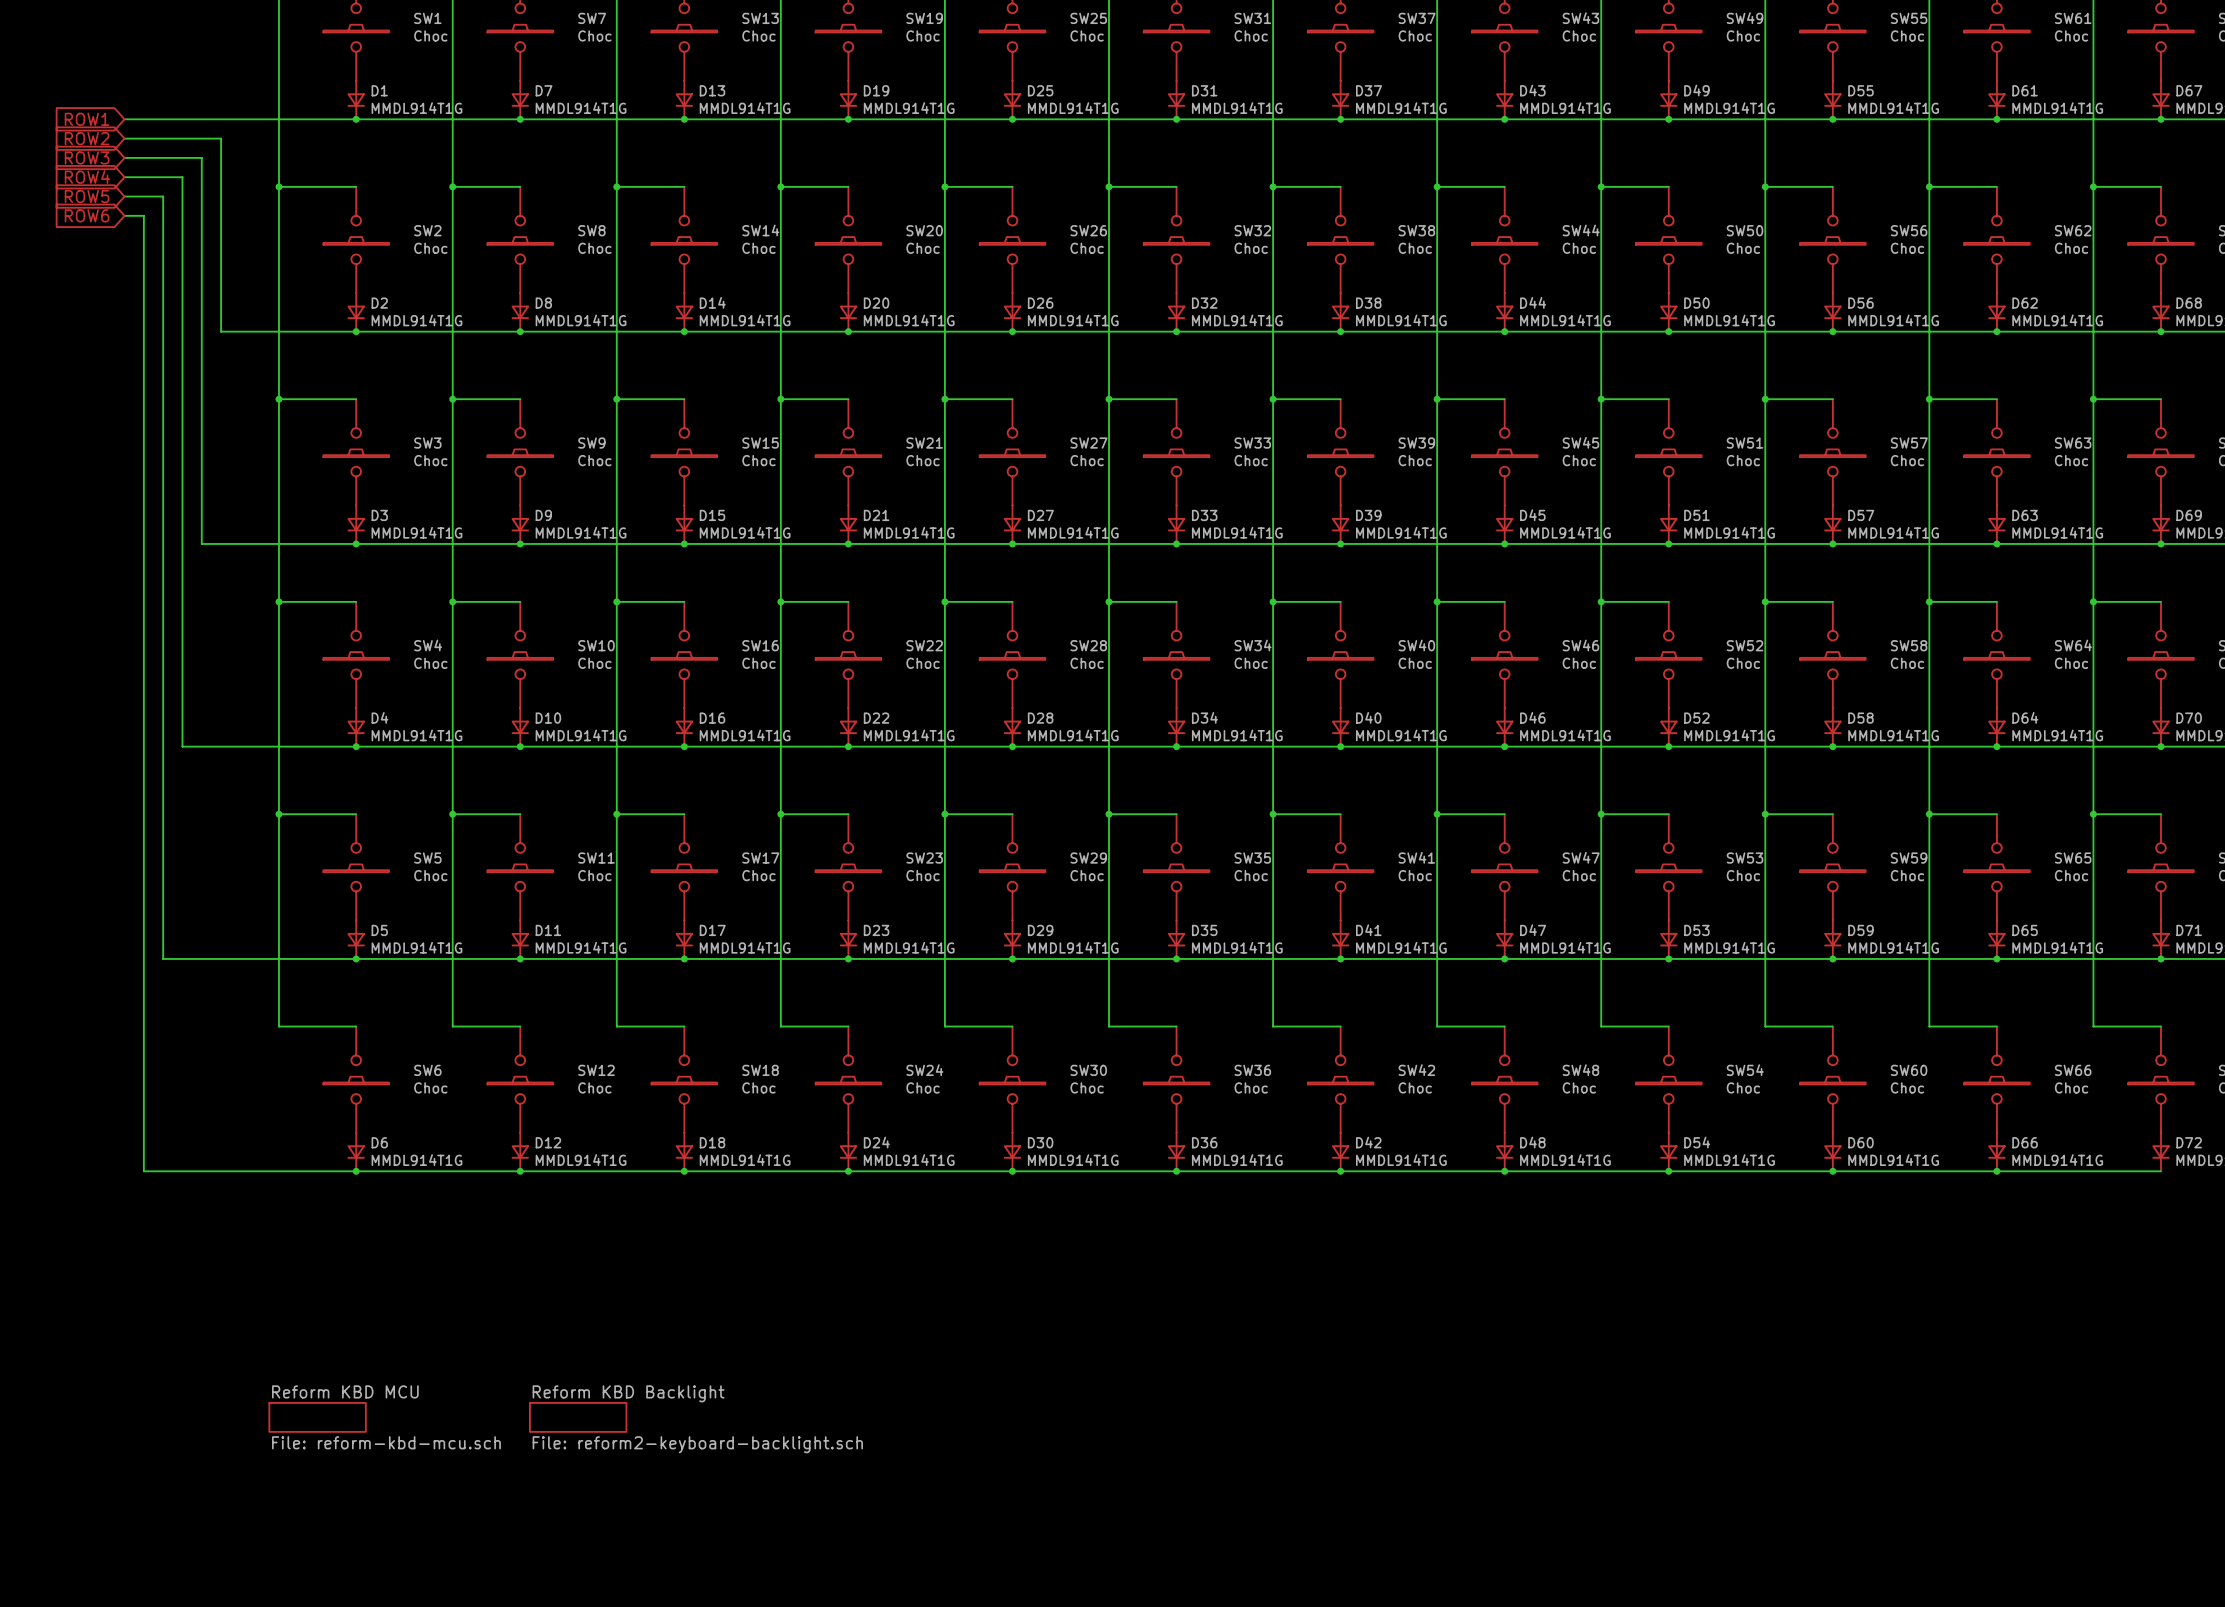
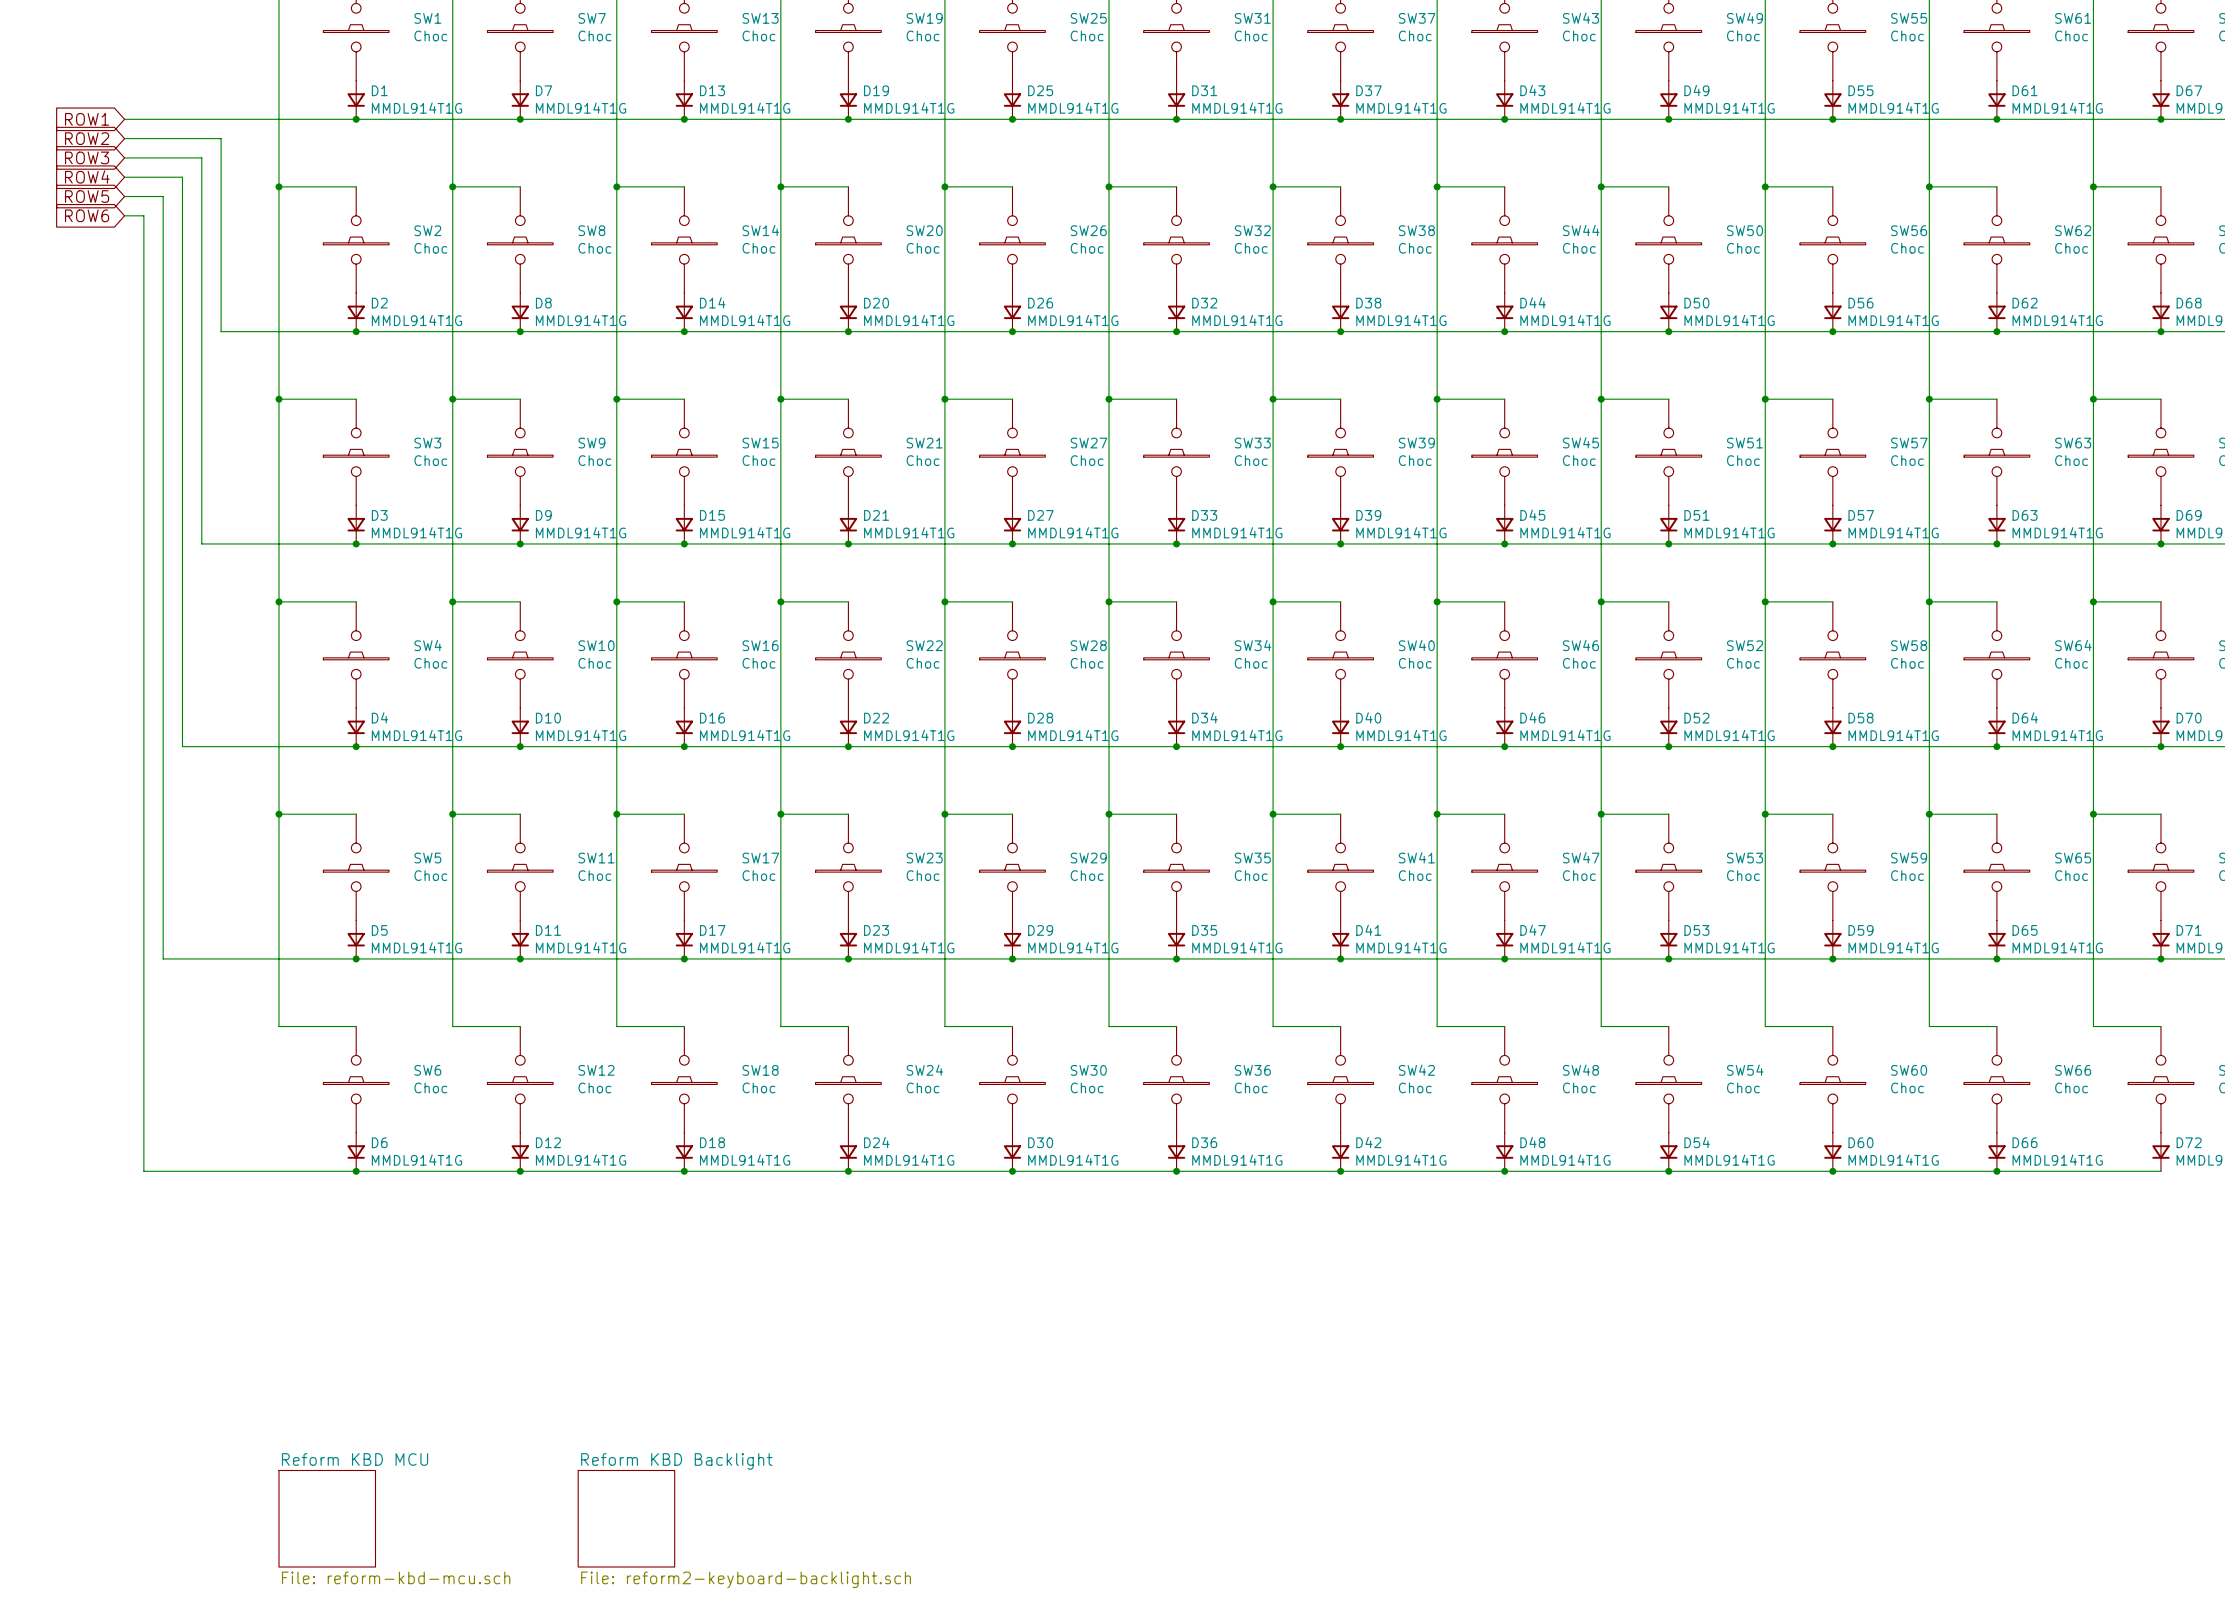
sheet Reform KBD MCU: File: reform-kbd-mcu.sch (317, 1417) -> none
sheet Reform KBD Backlight: File: reform2-keyboard-backlight.sch (578, 1417) -> none
sheet Reform KBD MCU: none -> File: reform-kbd-mcu.sch (327, 1518)
sheet Reform KBD Backlight: none -> File: reform2-keyboard-backlight.sch (626, 1518)

